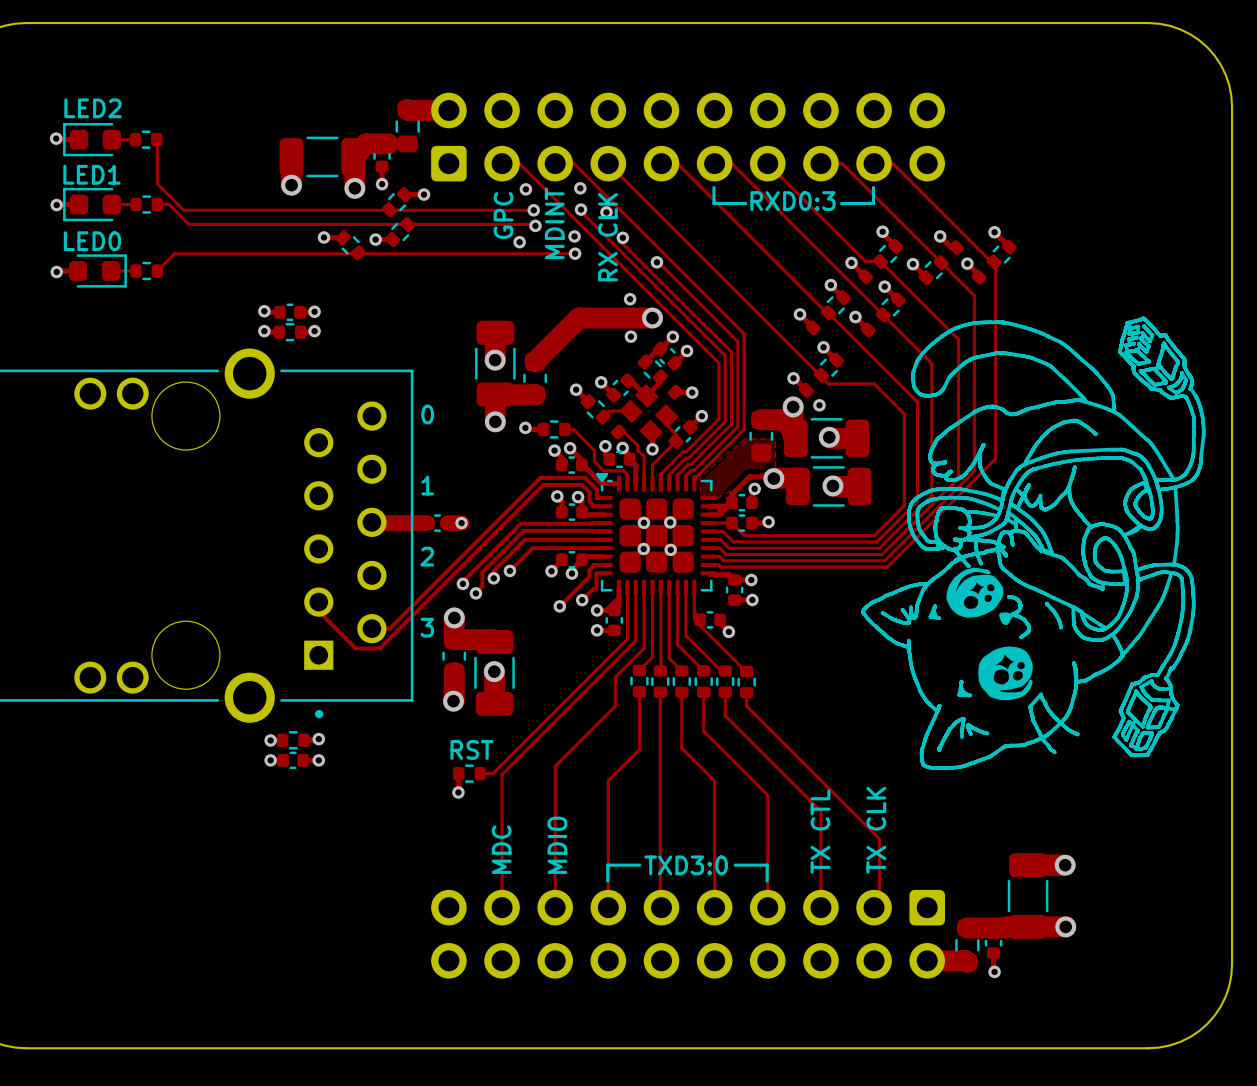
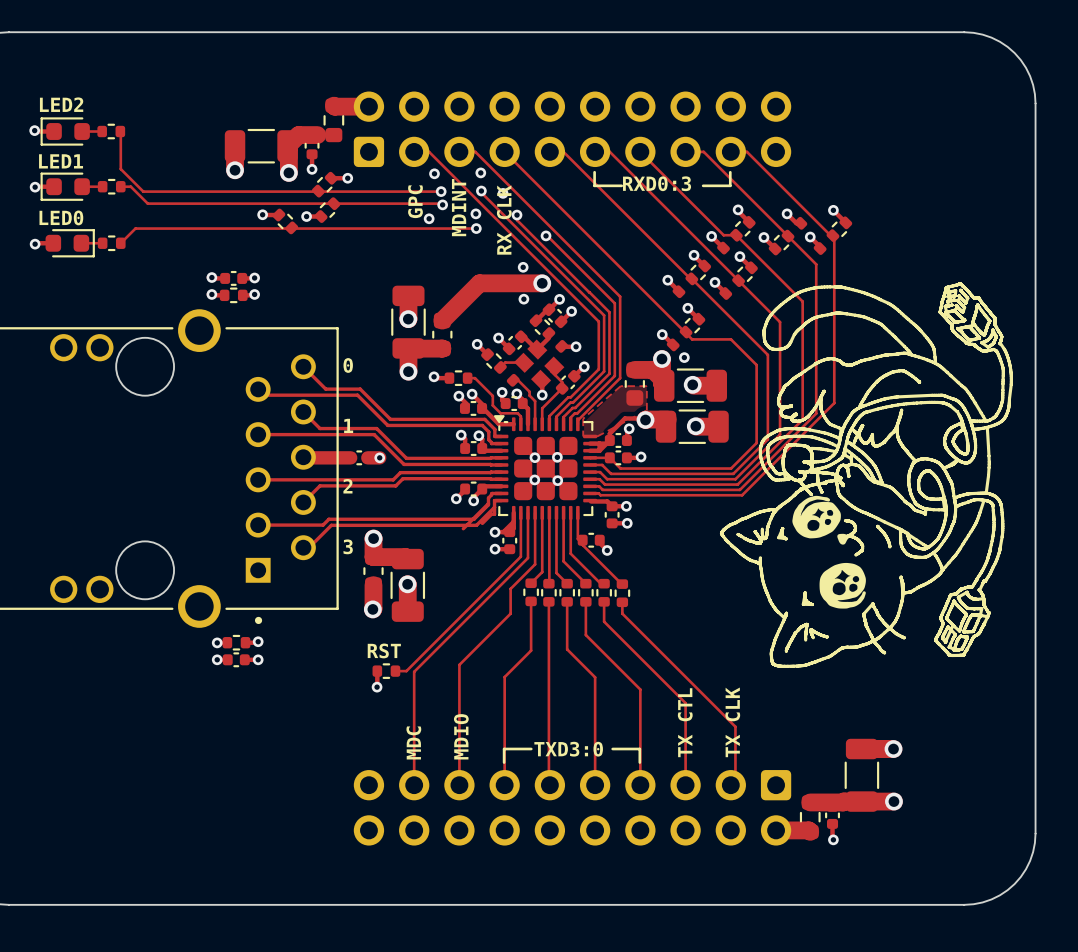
track: none -> (303, 366) (325, 389) (360, 389) (390, 419) (446, 419)
track: none -> (263, 395) (357, 395) (387, 425) (449, 425)
track: (540, 477) (389, 628) (378, 628) -> (494, 507) (476, 525) (331, 525) (309, 547)
track: (543, 485) (380, 648) (355, 648) (318, 611) (318, 602) -> (488, 503) (474, 519) (328, 519) (323, 525) (258, 525)
track: (520, 523) (462, 581) (462, 583) -> (430, 458) (406, 458) (376, 428) (319, 428) (303, 411)
track: (523, 530) (482, 572) (482, 586) (475, 593) -> (432, 464) (404, 464) (374, 434) (258, 434)
track: (592, 539) (524, 539) (493, 570) (493, 578) -> (491, 472) (400, 472) (393, 479) (258, 479)
track: (604, 548) (532, 548) (509, 570) -> (501, 479) (402, 478) (395, 485) (319, 485) (303, 502)
via: (509, 570) -> none
via: (493, 578) -> none
via: (462, 583) -> none
via: (475, 593) -> none
via: (582, 600) -> none
via: (559, 606) -> none

